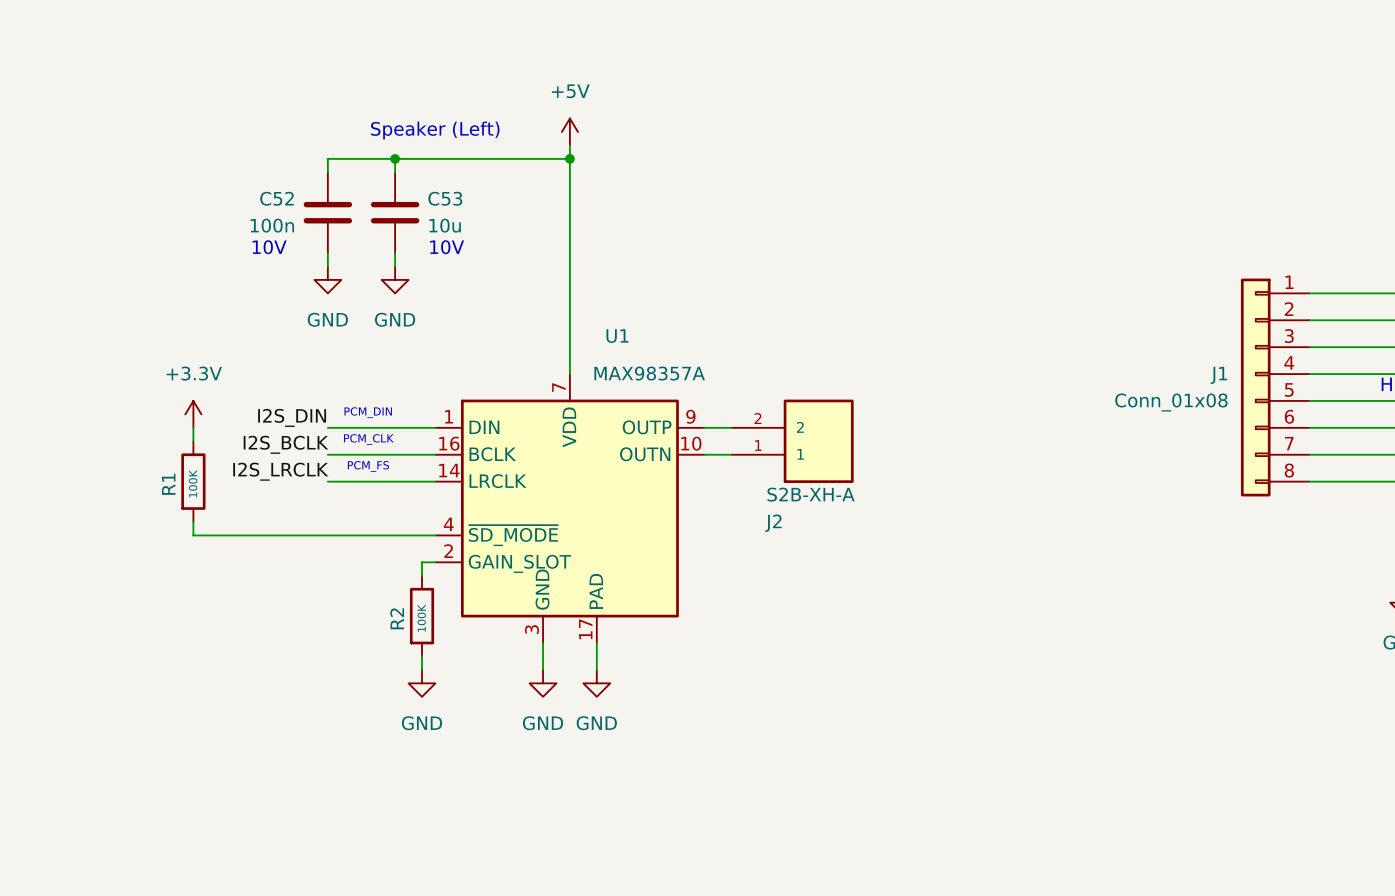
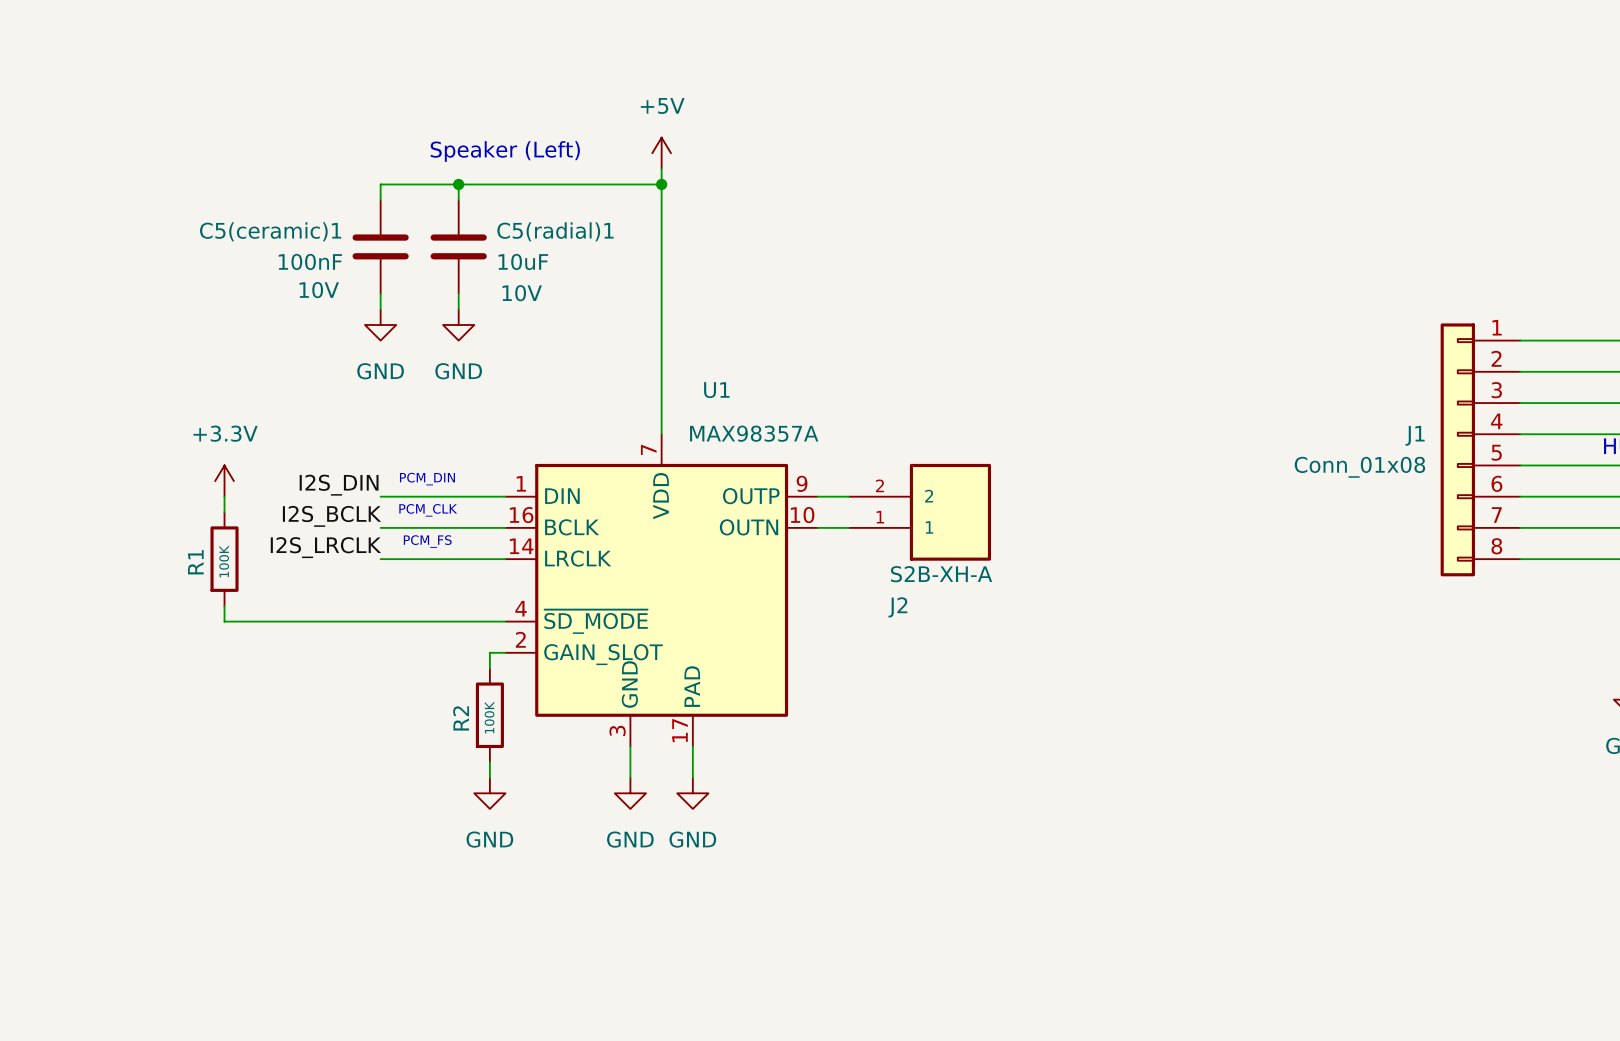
C52 name: C52 (277, 198) -> C5(ceramic)1 (270, 231)
C53 name: C53 (445, 198) -> C5(radial)1 (555, 231)
C52 value: 100n (272, 225) -> 100nF (310, 261)
C53 value: 10u (445, 225) -> 10uF (523, 261)
text: 10V (269, 247) -> none
text: 10V (447, 247) -> none
C52 text: none -> 10V (319, 290)
C53 text: none -> 10V (522, 293)

